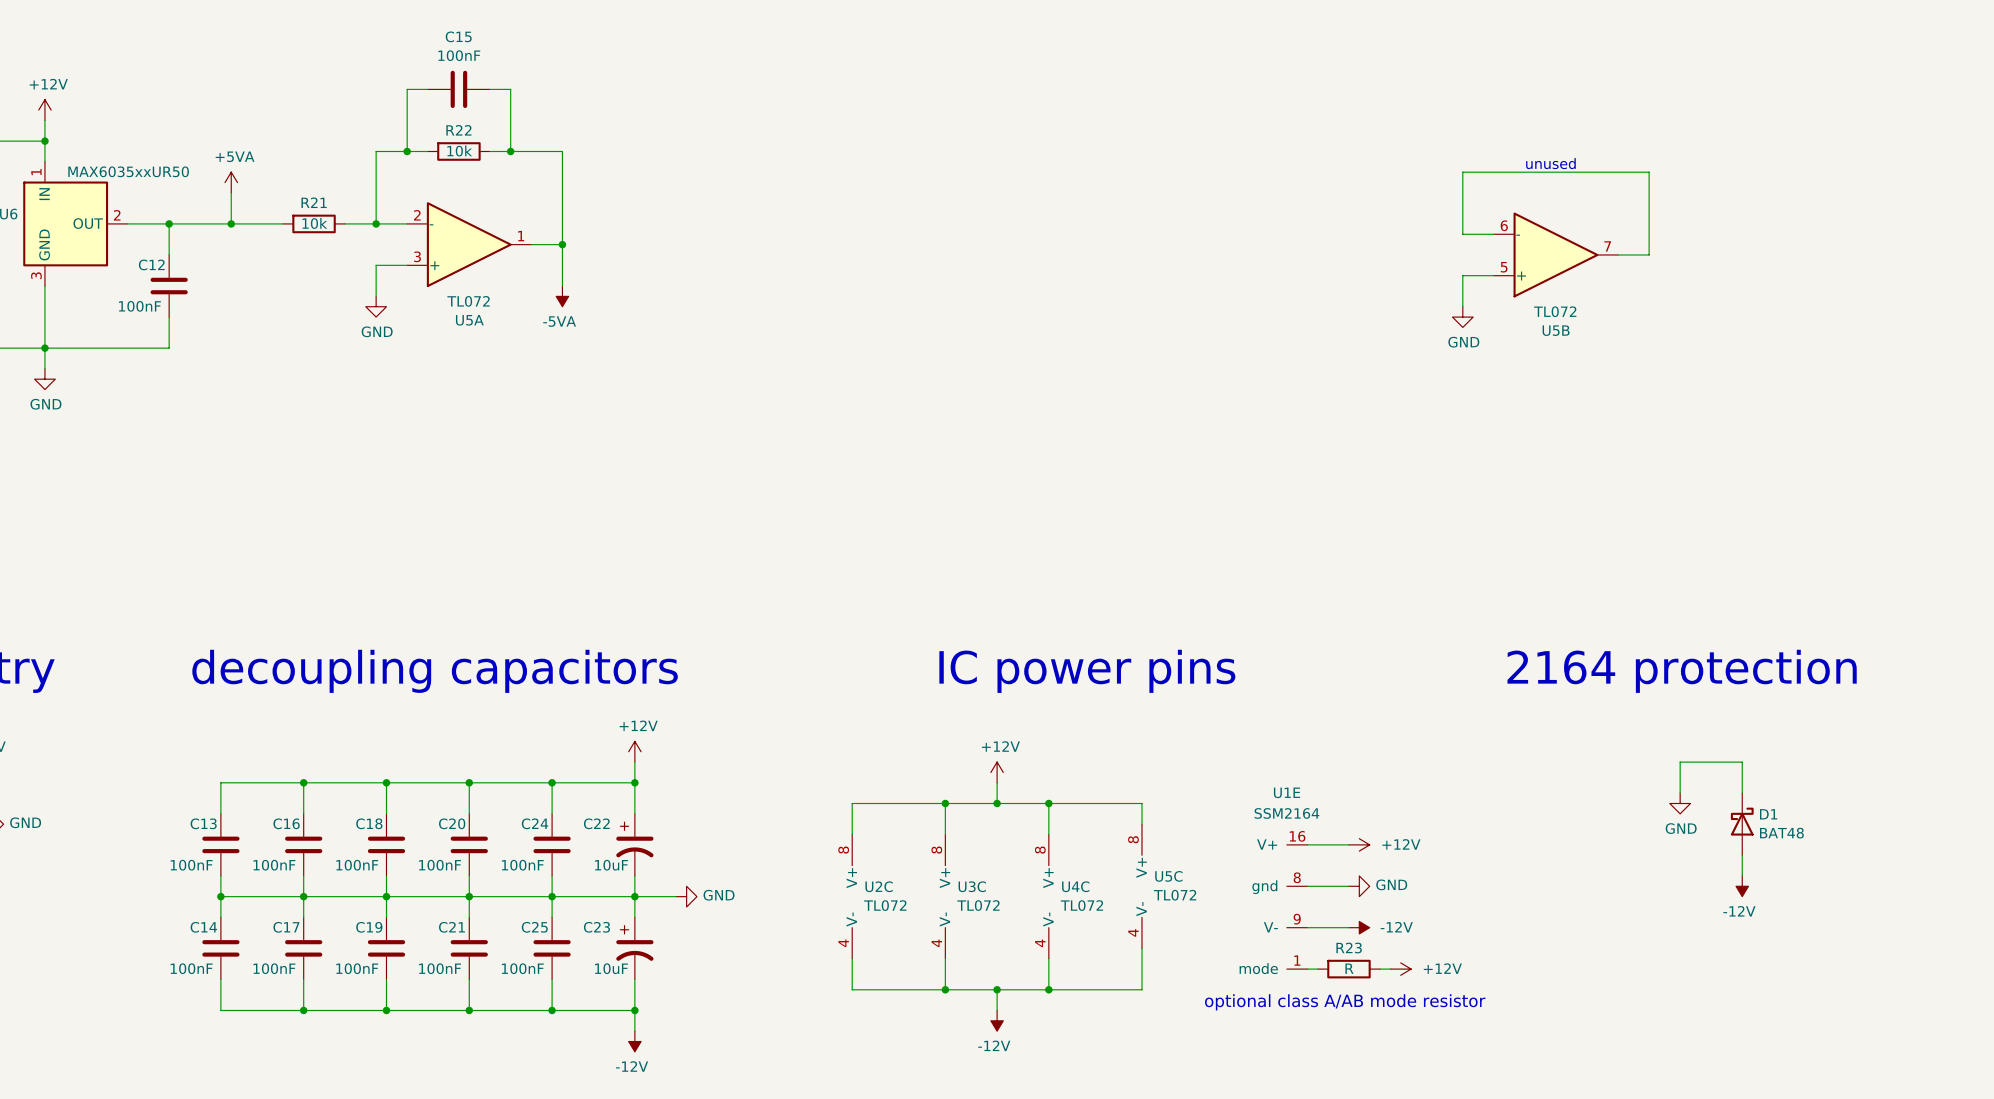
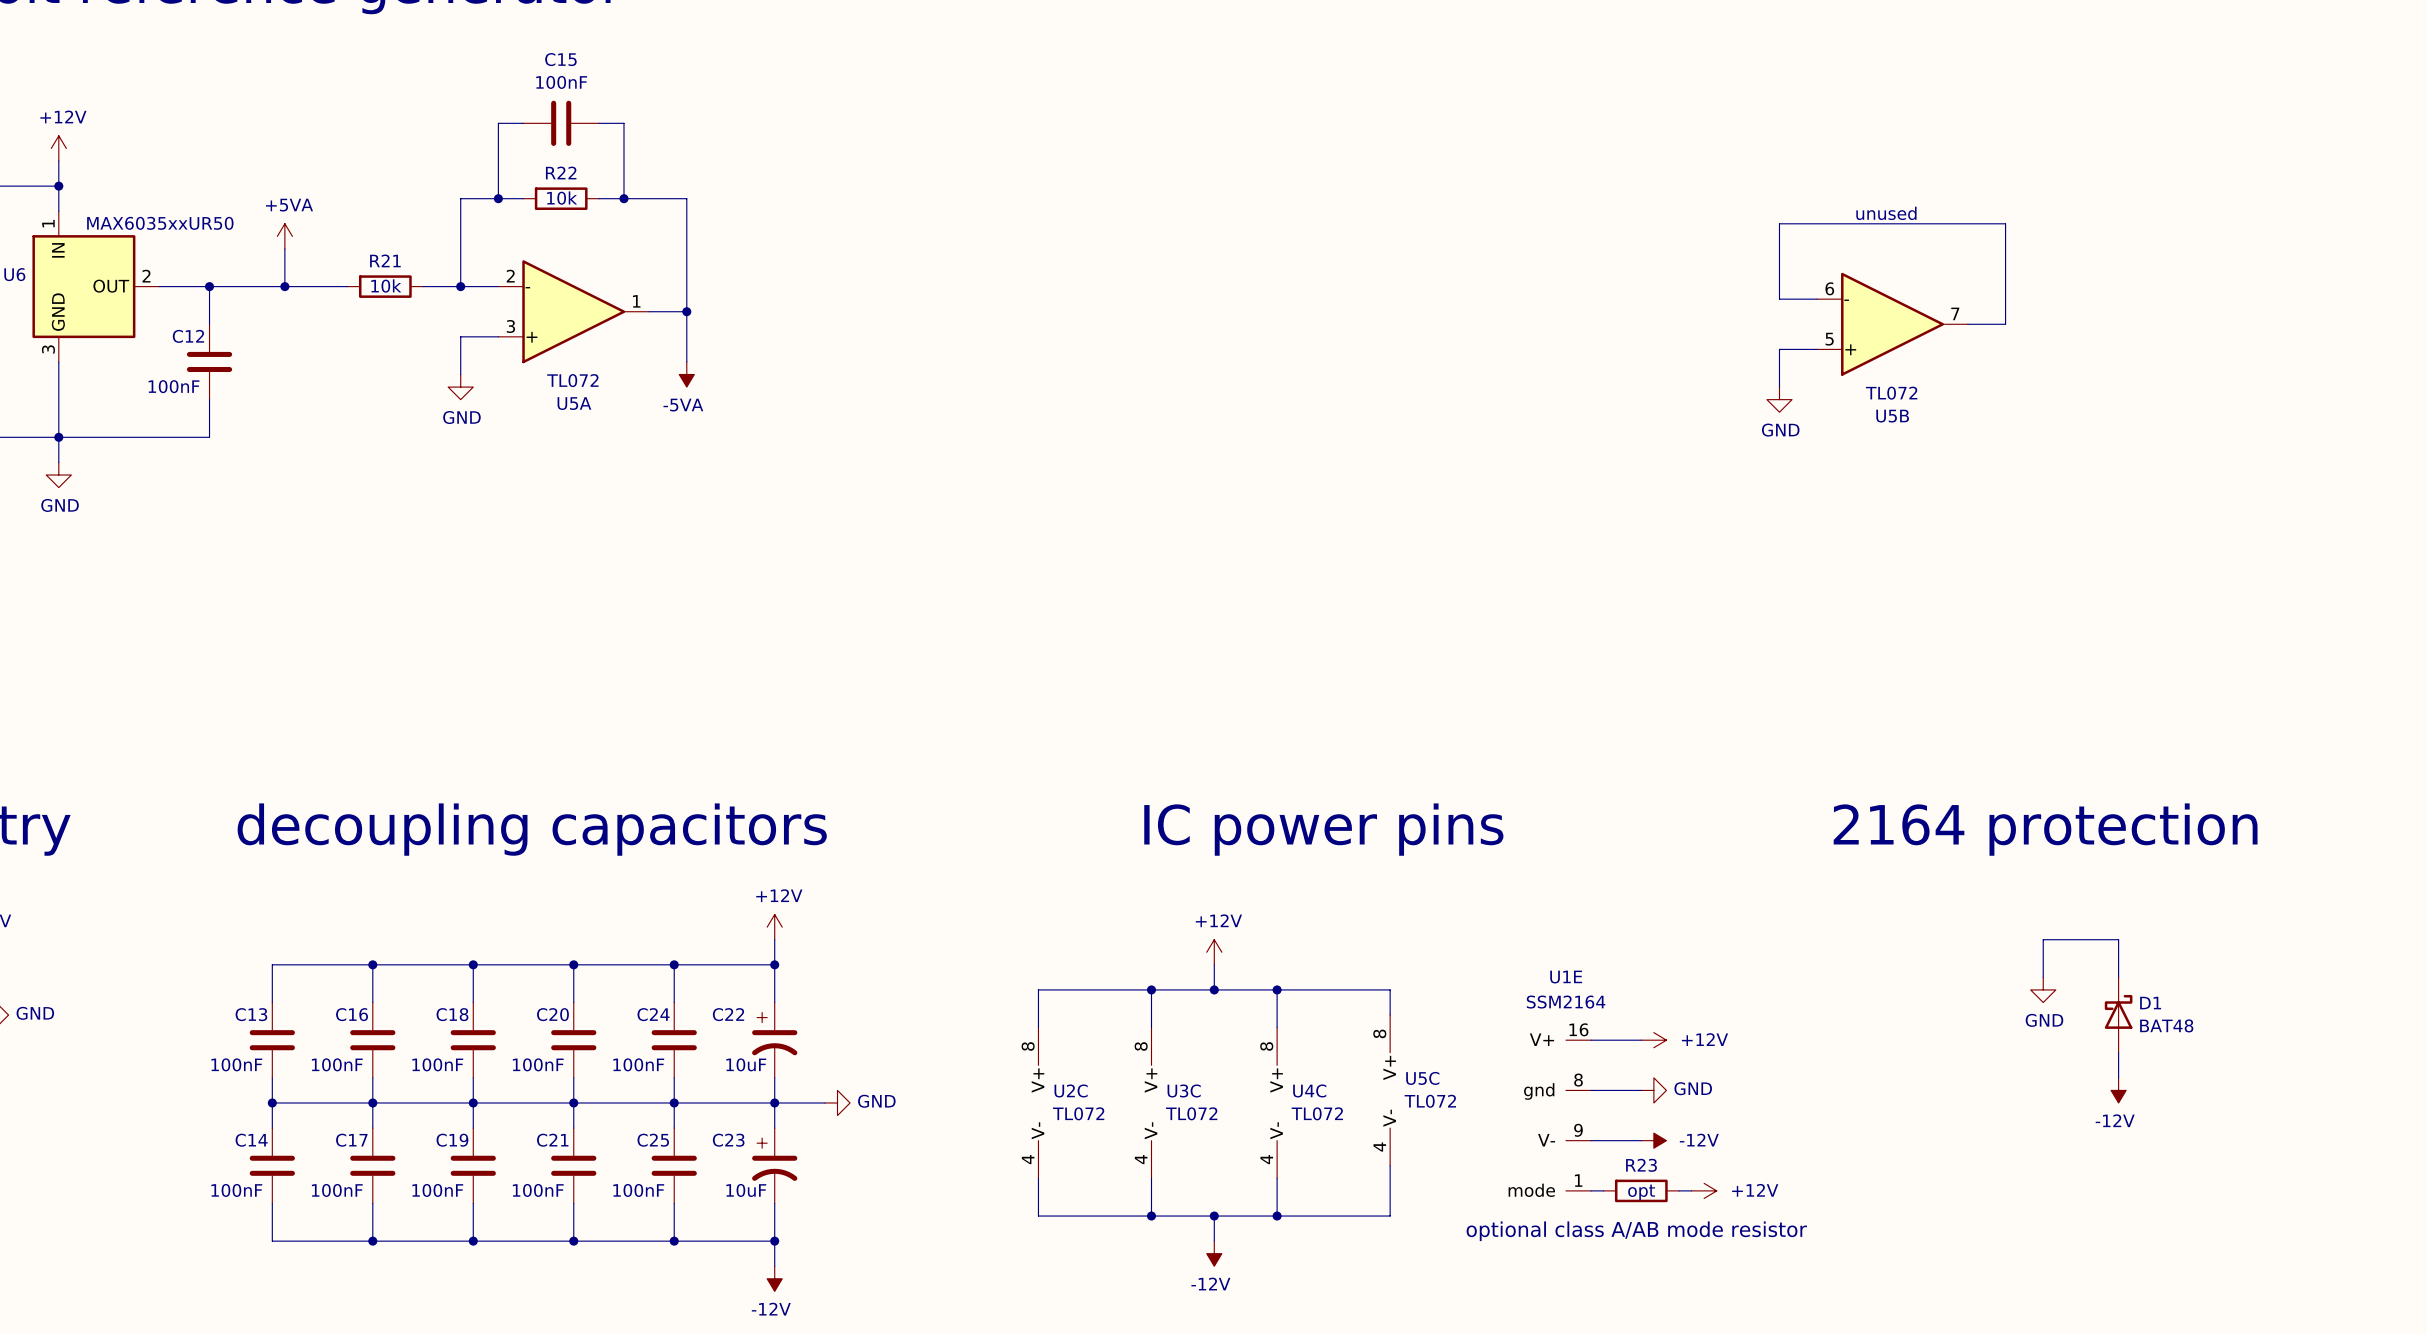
R23 value: R (1349, 968) -> opt (1641, 1192)

